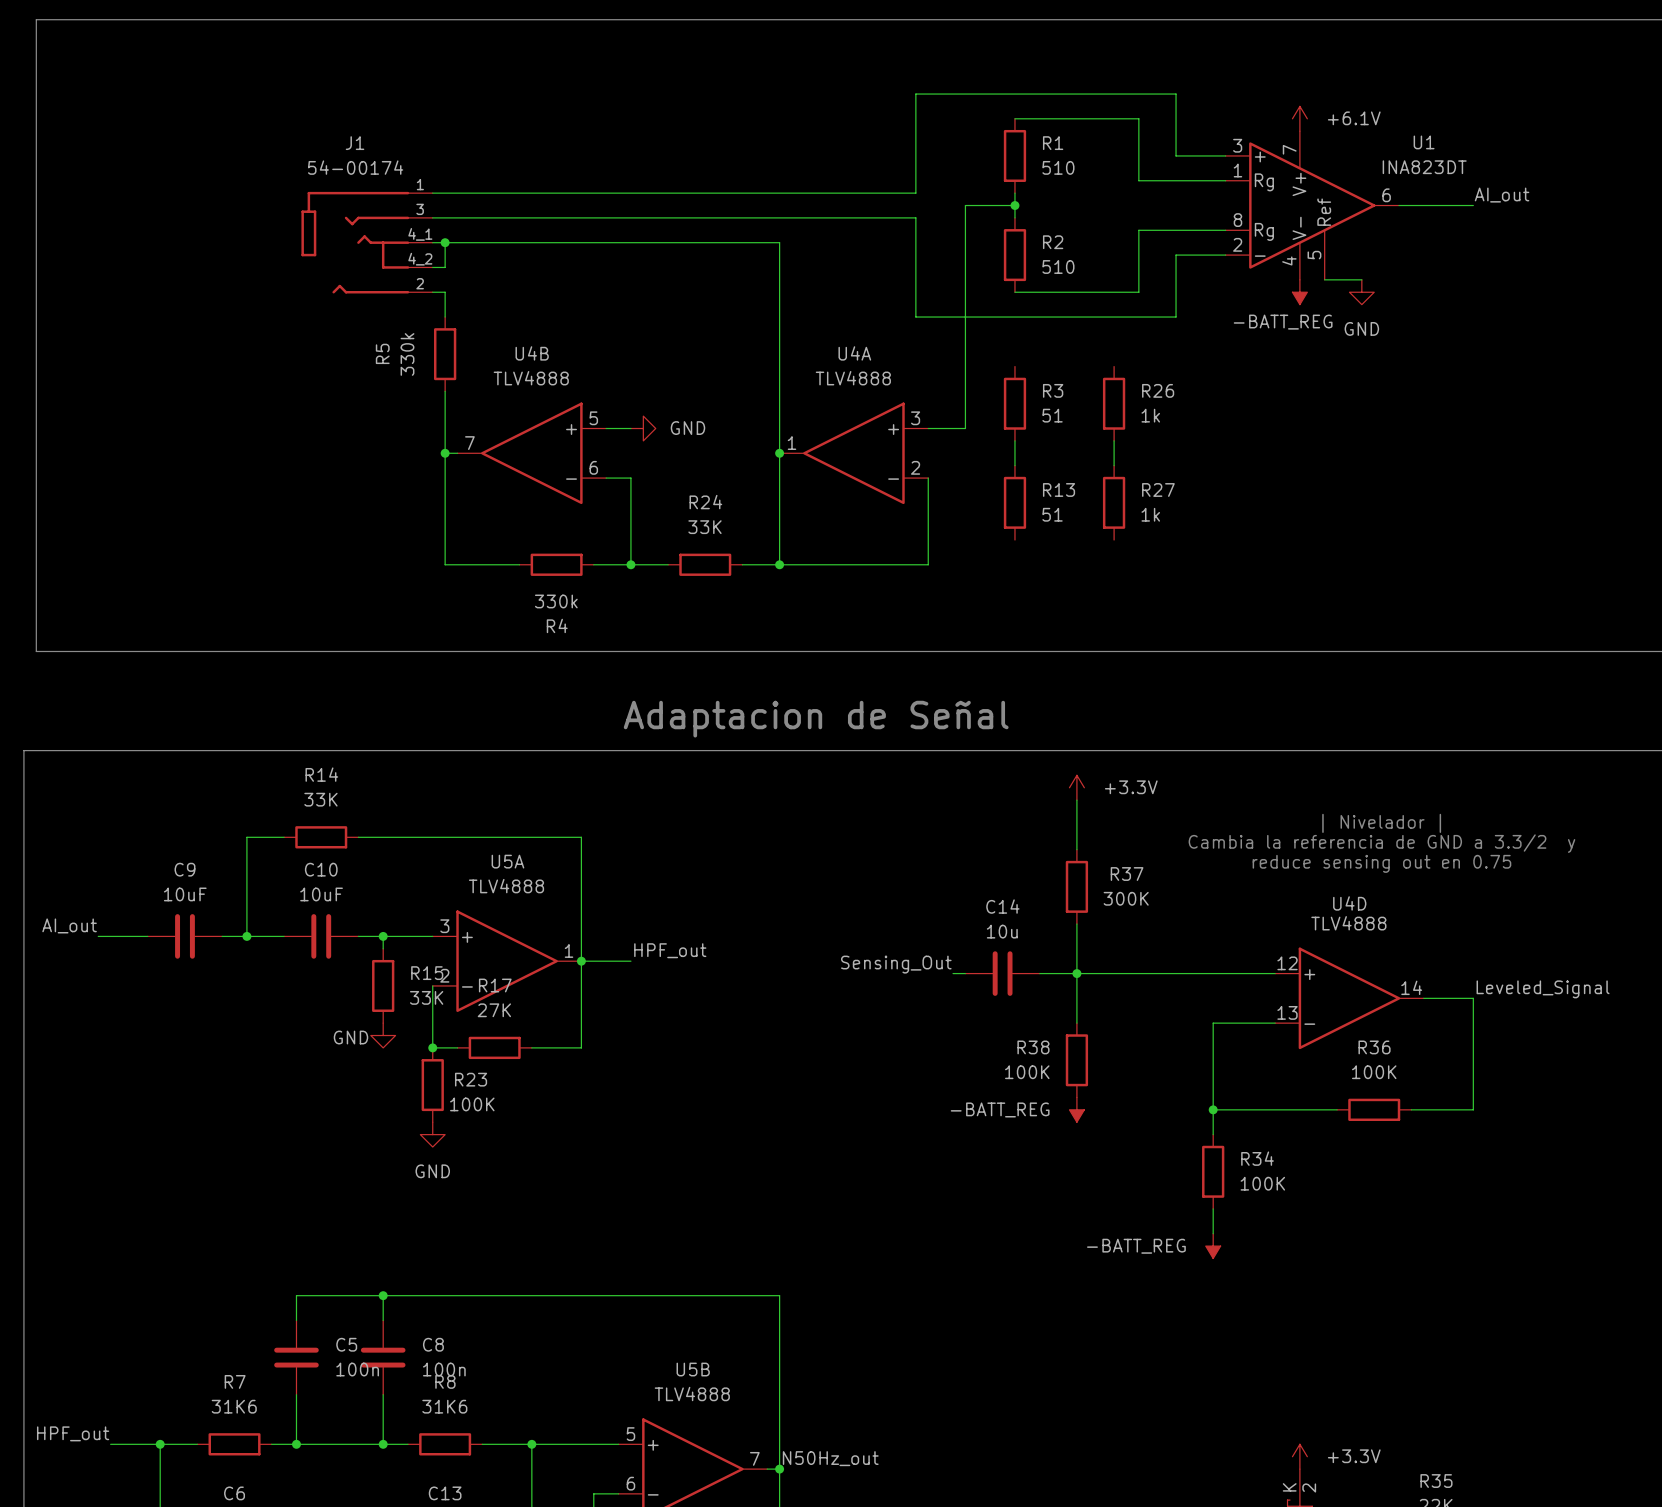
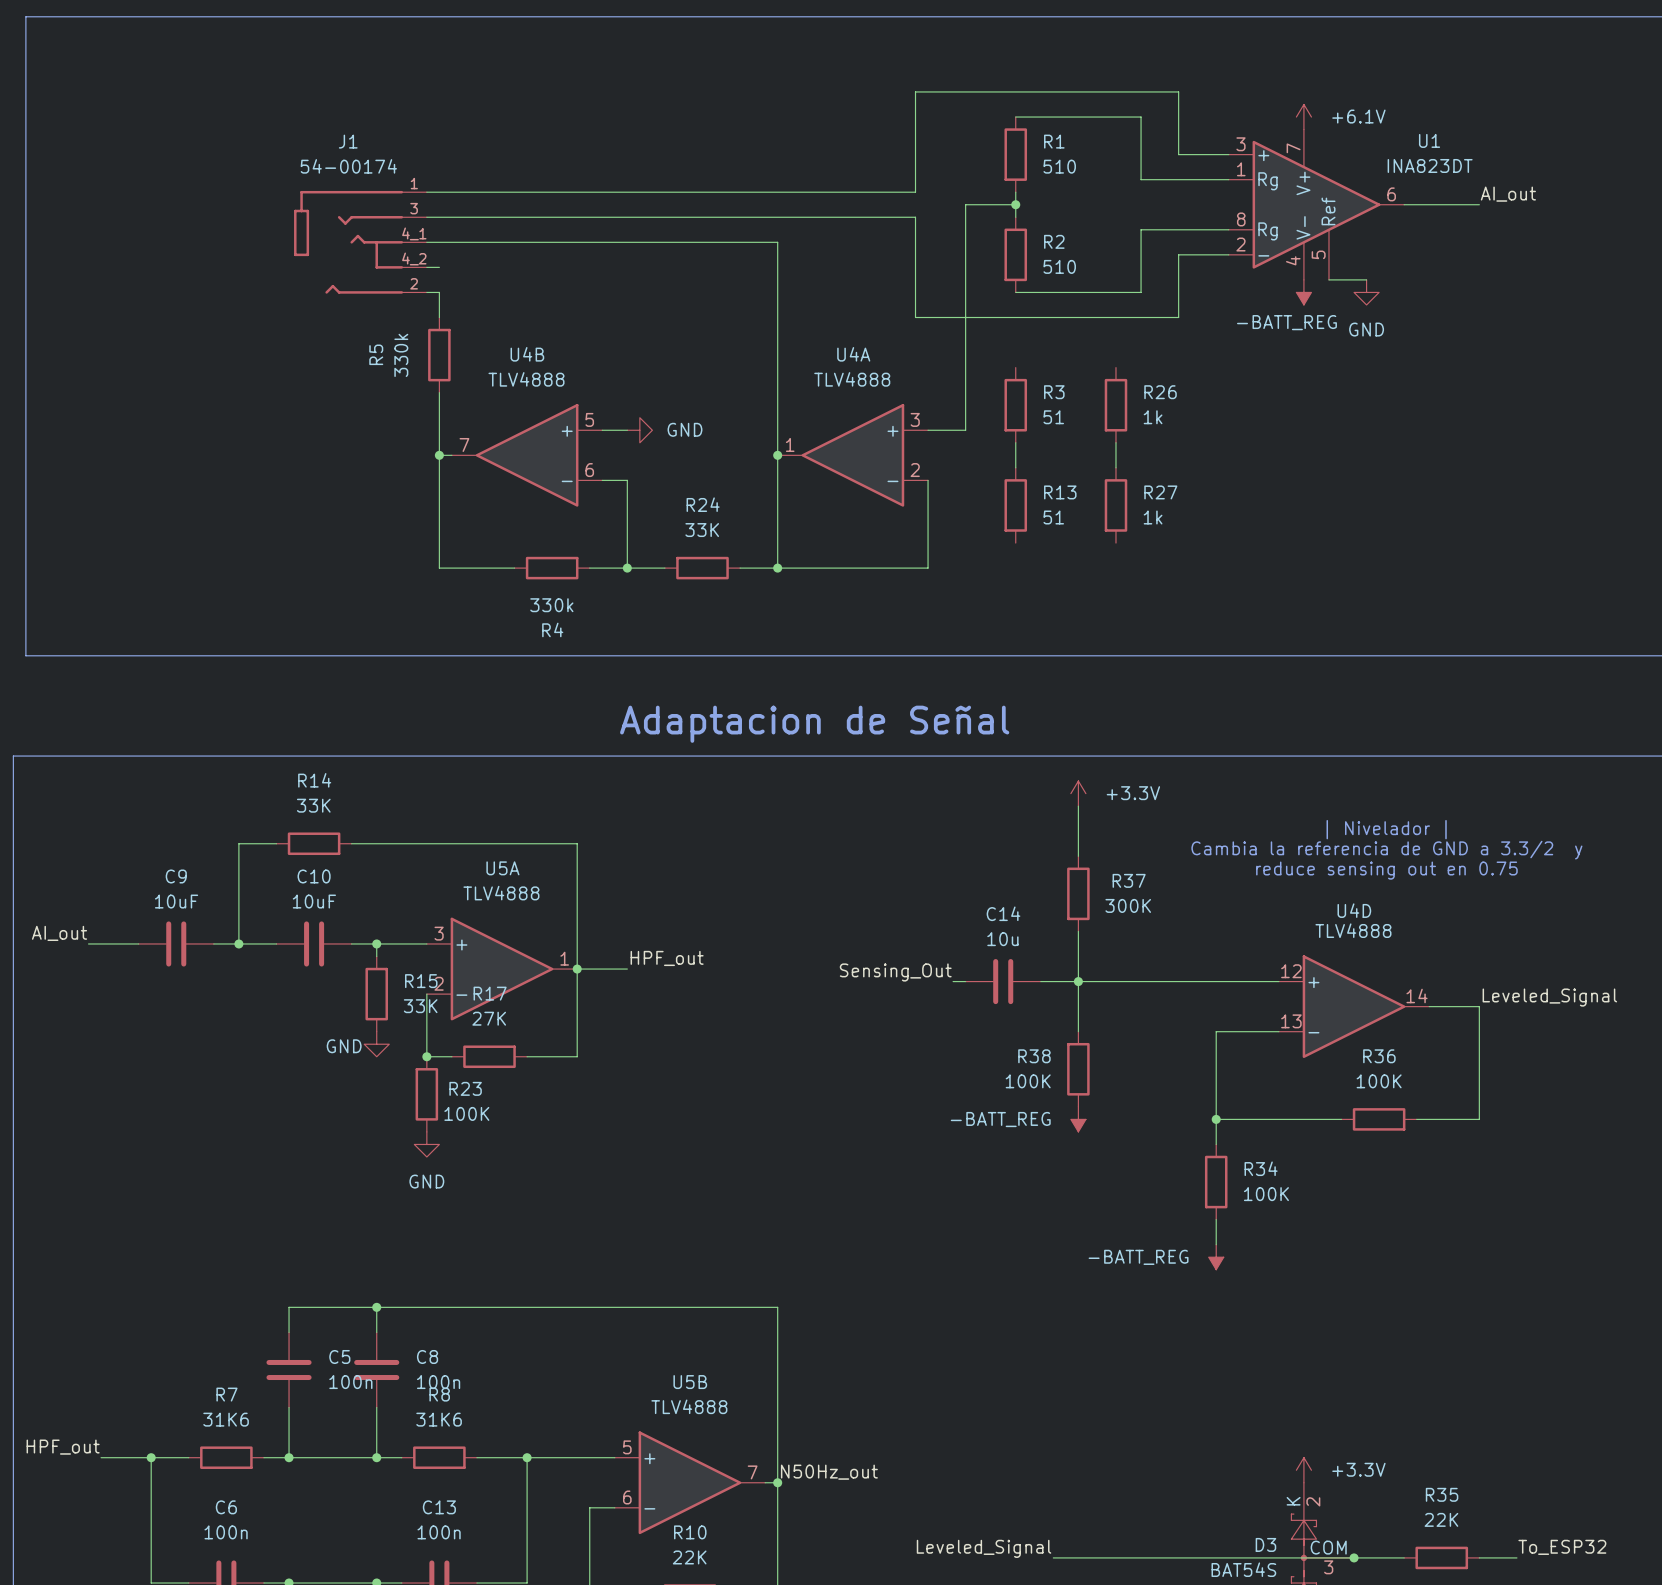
wire: (445, 242) (445, 267) -> none
junction: (445, 242) -> none

